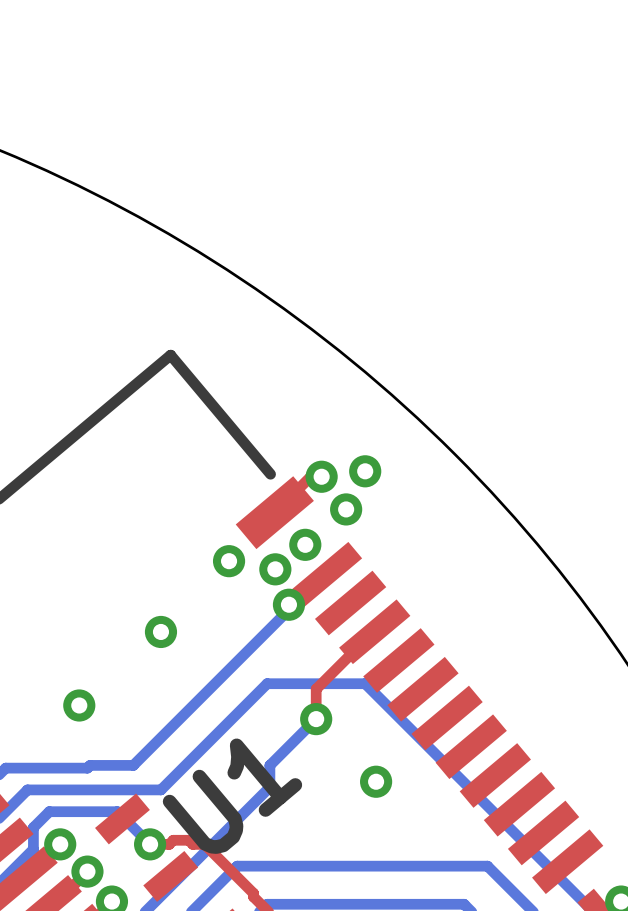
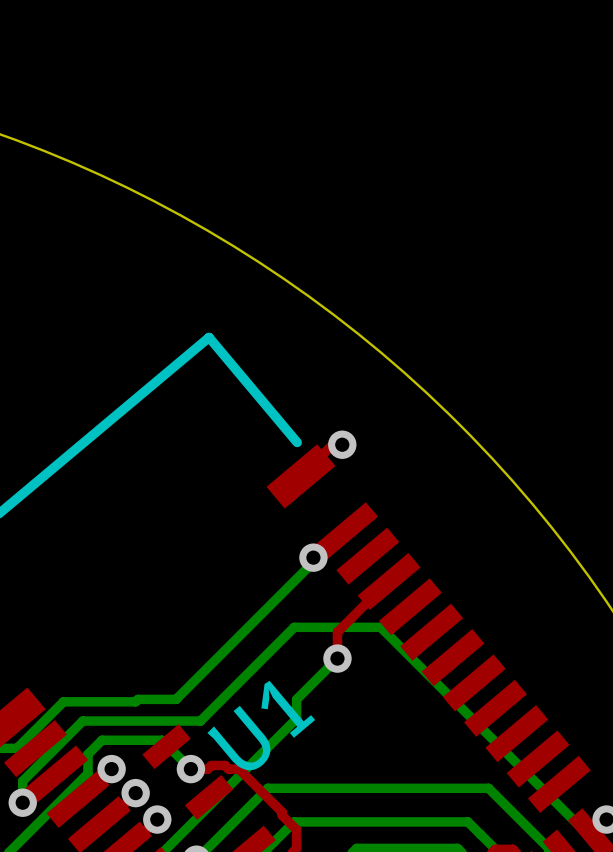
via: (365, 471) -> none
via: (346, 509) -> none
via: (305, 544) -> none
via: (229, 561) -> none
via: (275, 569) -> none
via: (160, 631) -> none
via: (79, 705) -> none
via: (376, 781) -> none

